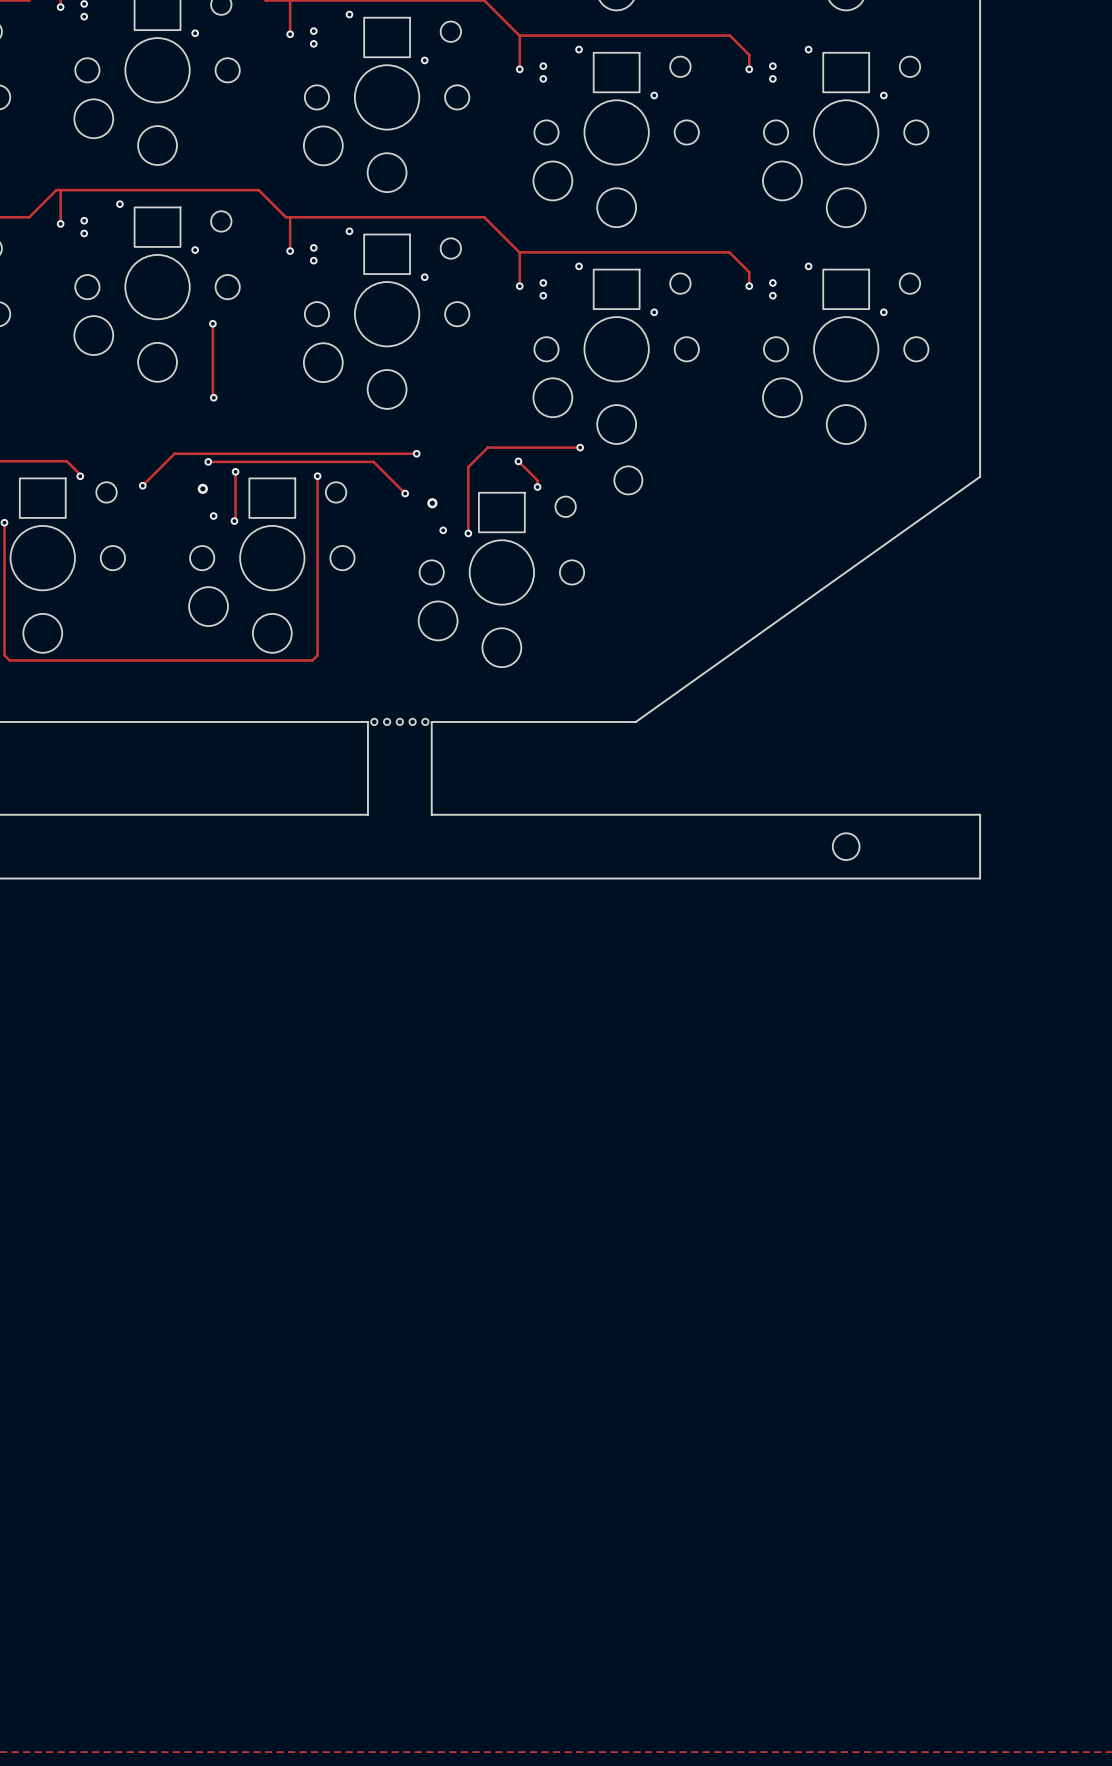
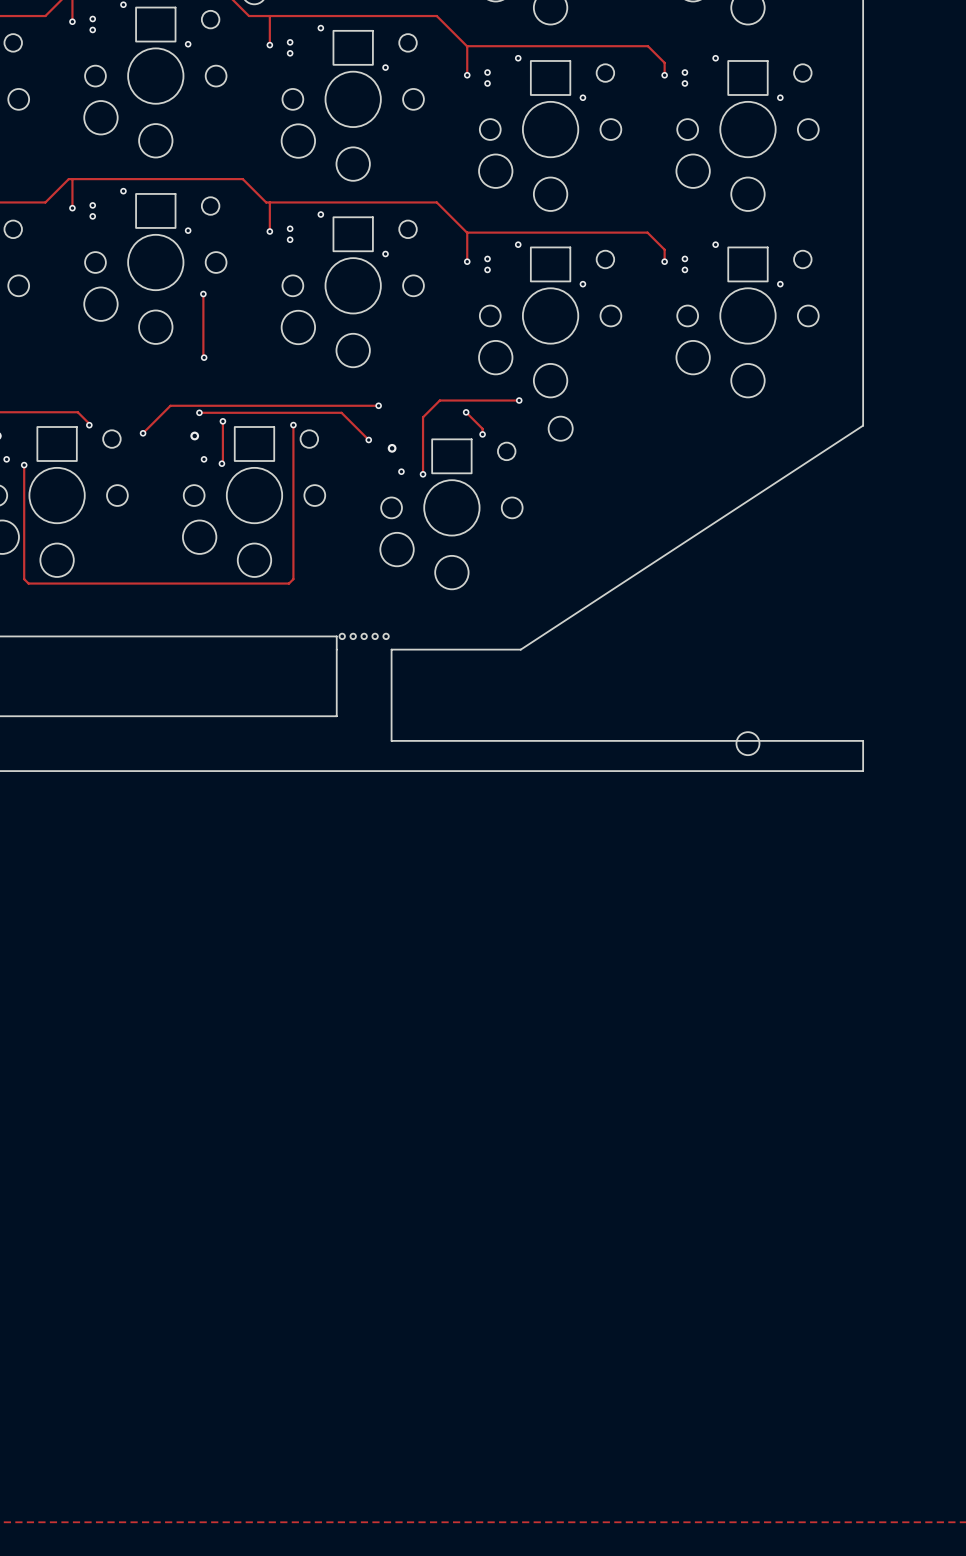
board edge: (980, 476) (635, 721) (431, 721) (431, 737) -> (863, 425) (520, 649) (391, 649)
board edge: (431, 814) (980, 814) (980, 843) -> (391, 716) (391, 740) (863, 740)

